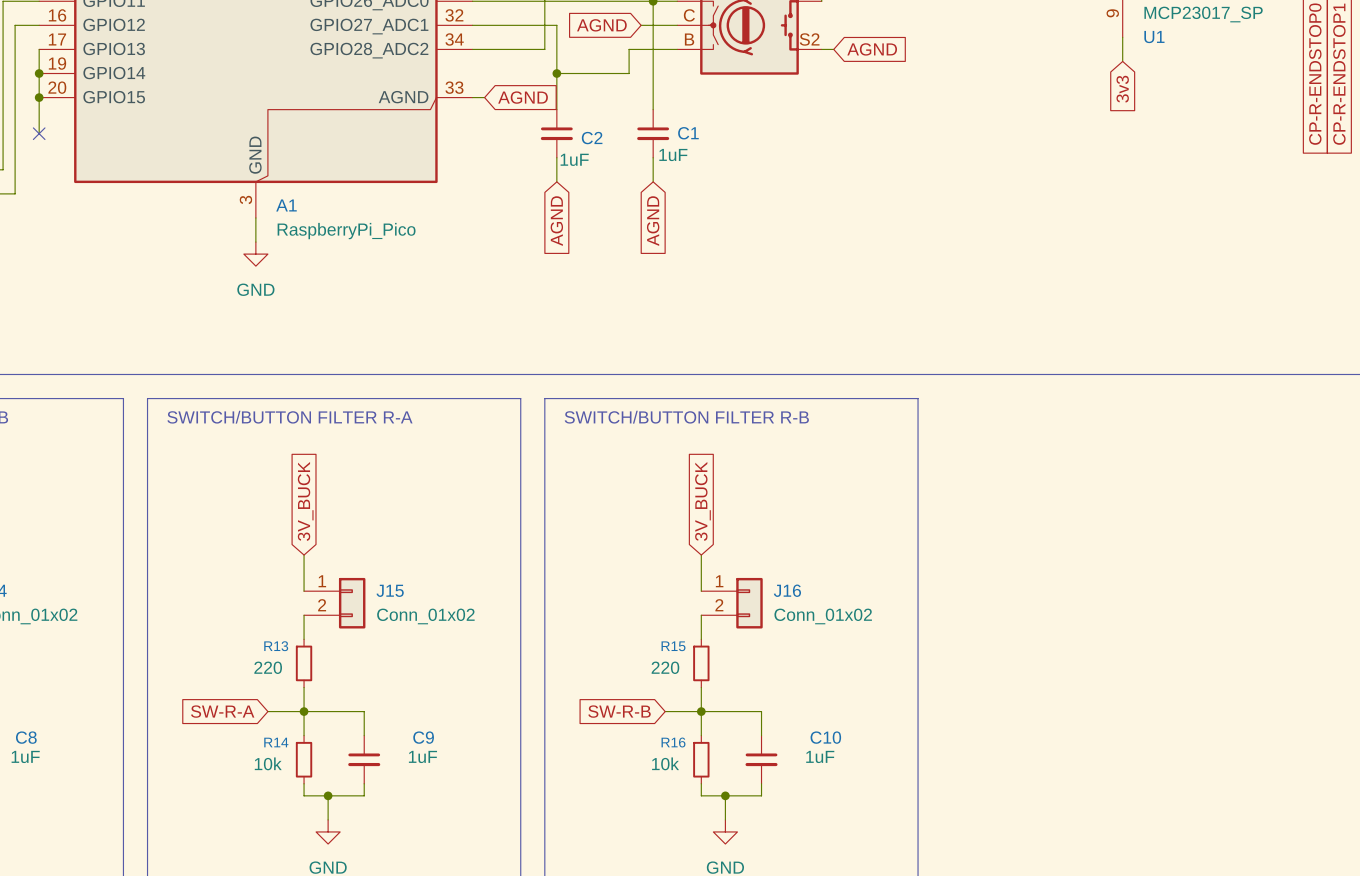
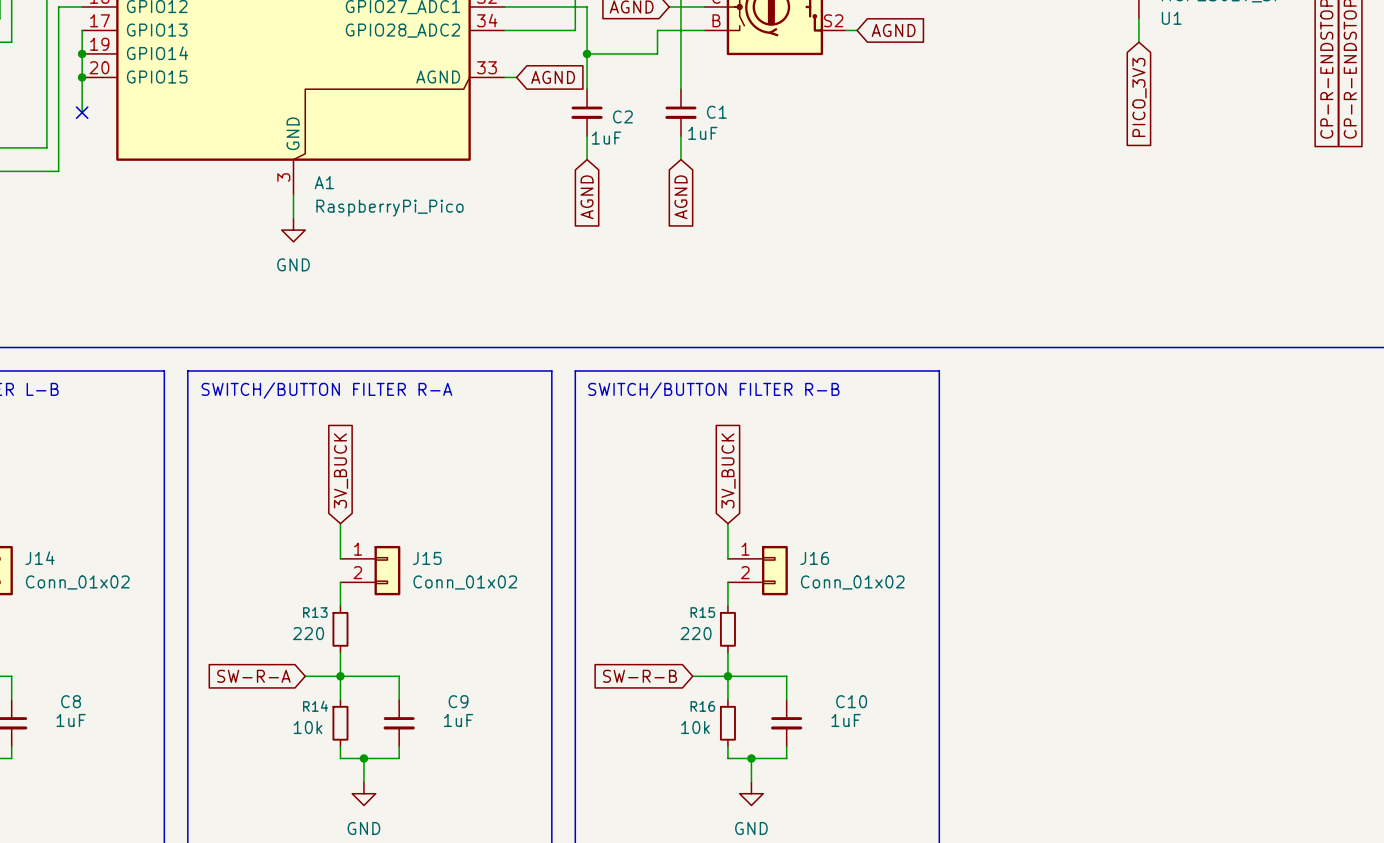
global label: 3v3 (1122, 89) -> PICO_3V3 (1139, 97)

